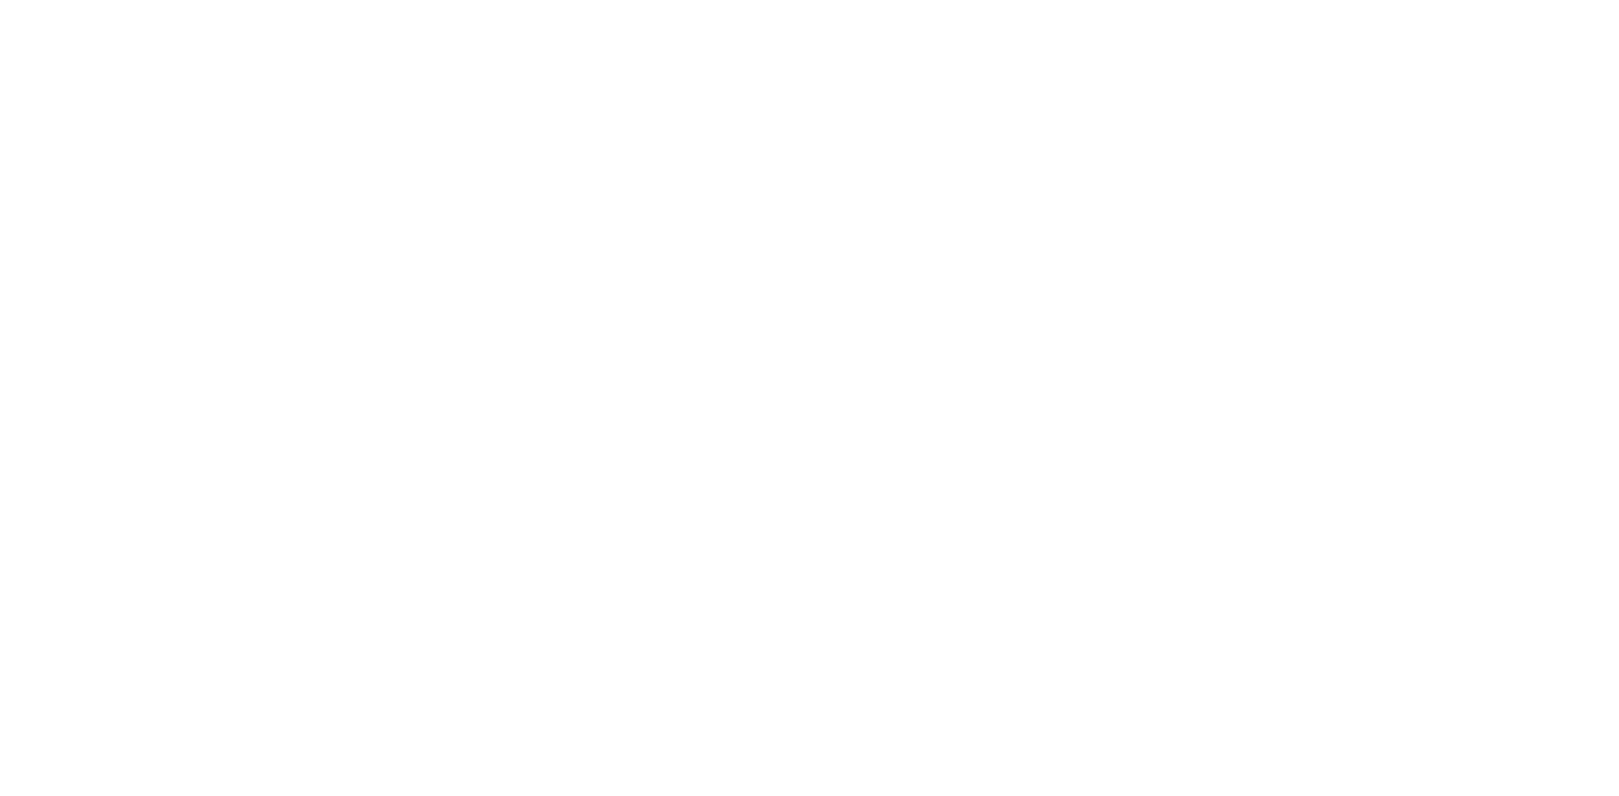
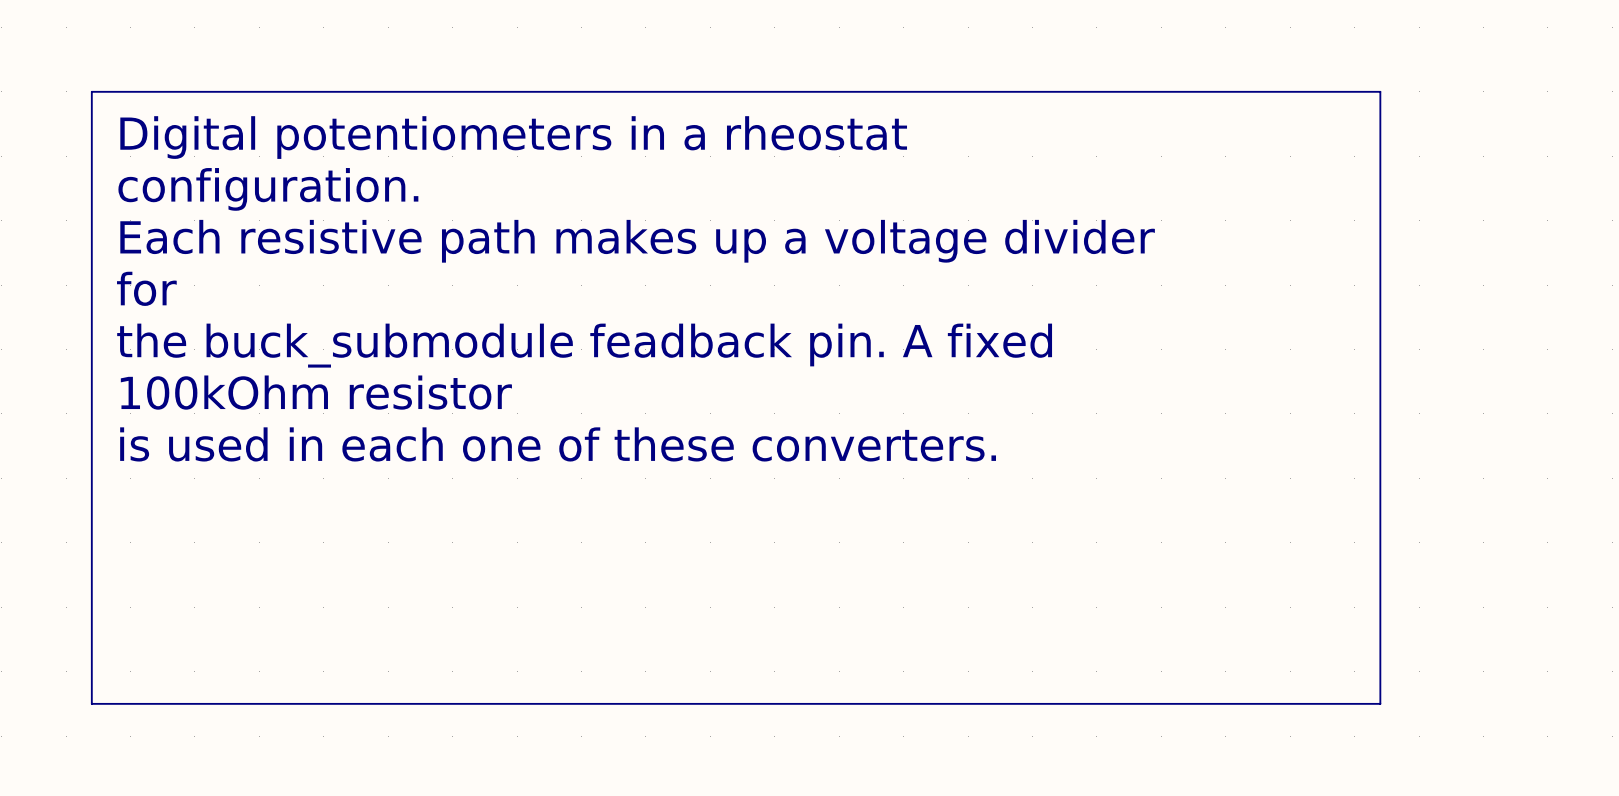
line: none -> (91, 91) (1380, 91) (1380, 703) (91, 703) (91, 91)
text: none -> Digital potentiometers in a rheostat (513, 137)
text: none -> configuration. (268, 189)
text: none -> Each resistive path makes up a voltage divider (637, 241)
text: none -> for (146, 288)
text: none -> the buck_submodule feadback pin. A fixed (584, 345)
text: none -> 100kOhm resistor (316, 392)
text: none -> is used in each one of these converters. (558, 444)

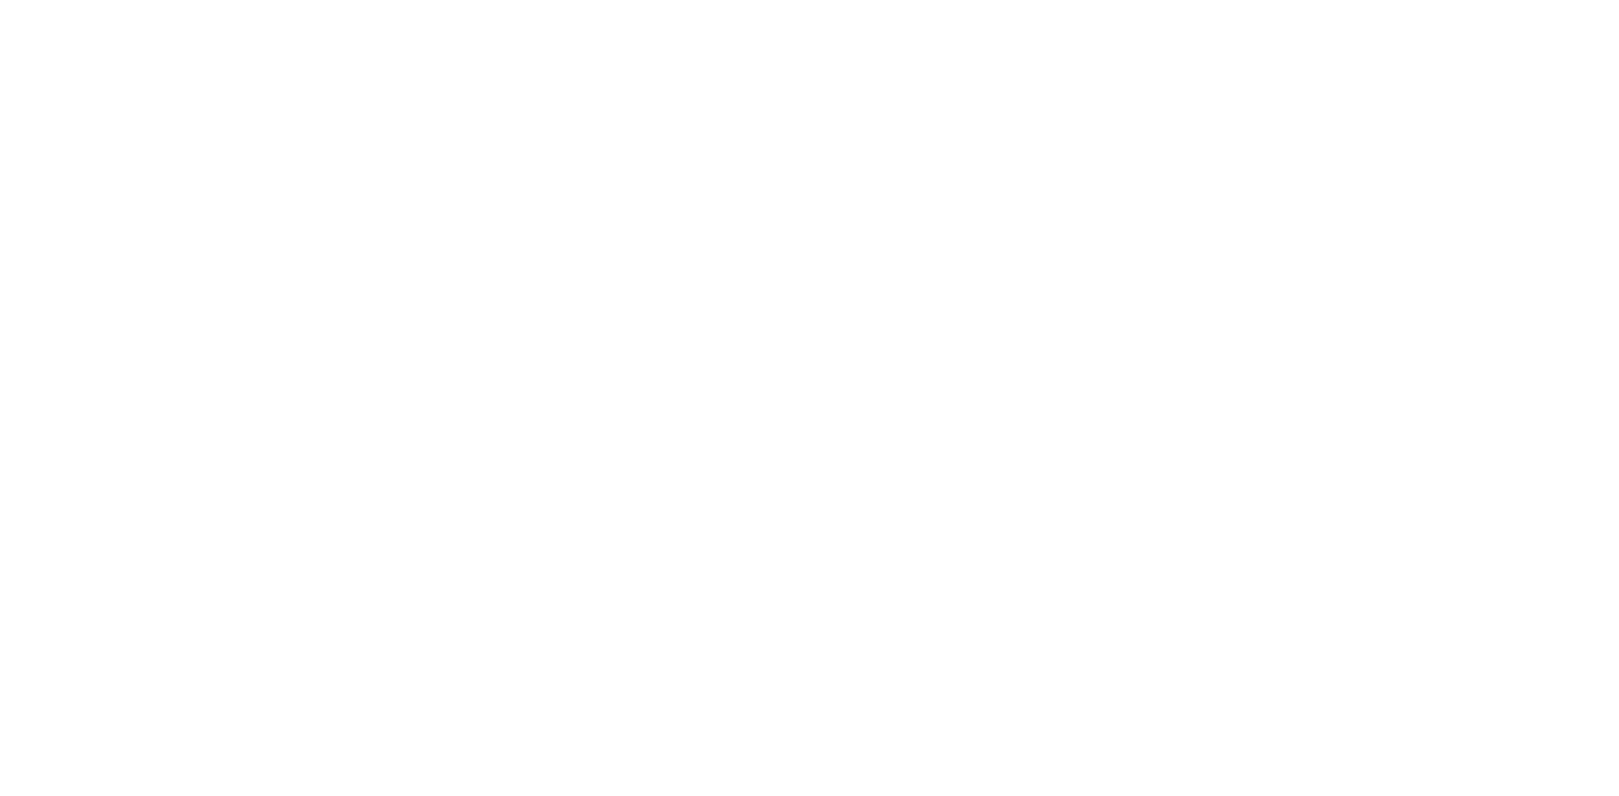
line: (91, 91) (1380, 91) (1380, 703) (91, 703) (91, 91) -> none
text: Digital potentiometers in a rheostat (513, 137) -> none
text: configuration. (268, 189) -> none
text: Each resistive path makes up a voltage divider (637, 241) -> none
text: for (146, 288) -> none
text: the buck_submodule feadback pin. A fixed (584, 345) -> none
text: 100kOhm resistor (316, 392) -> none
text: is used in each one of these converters. (558, 444) -> none

